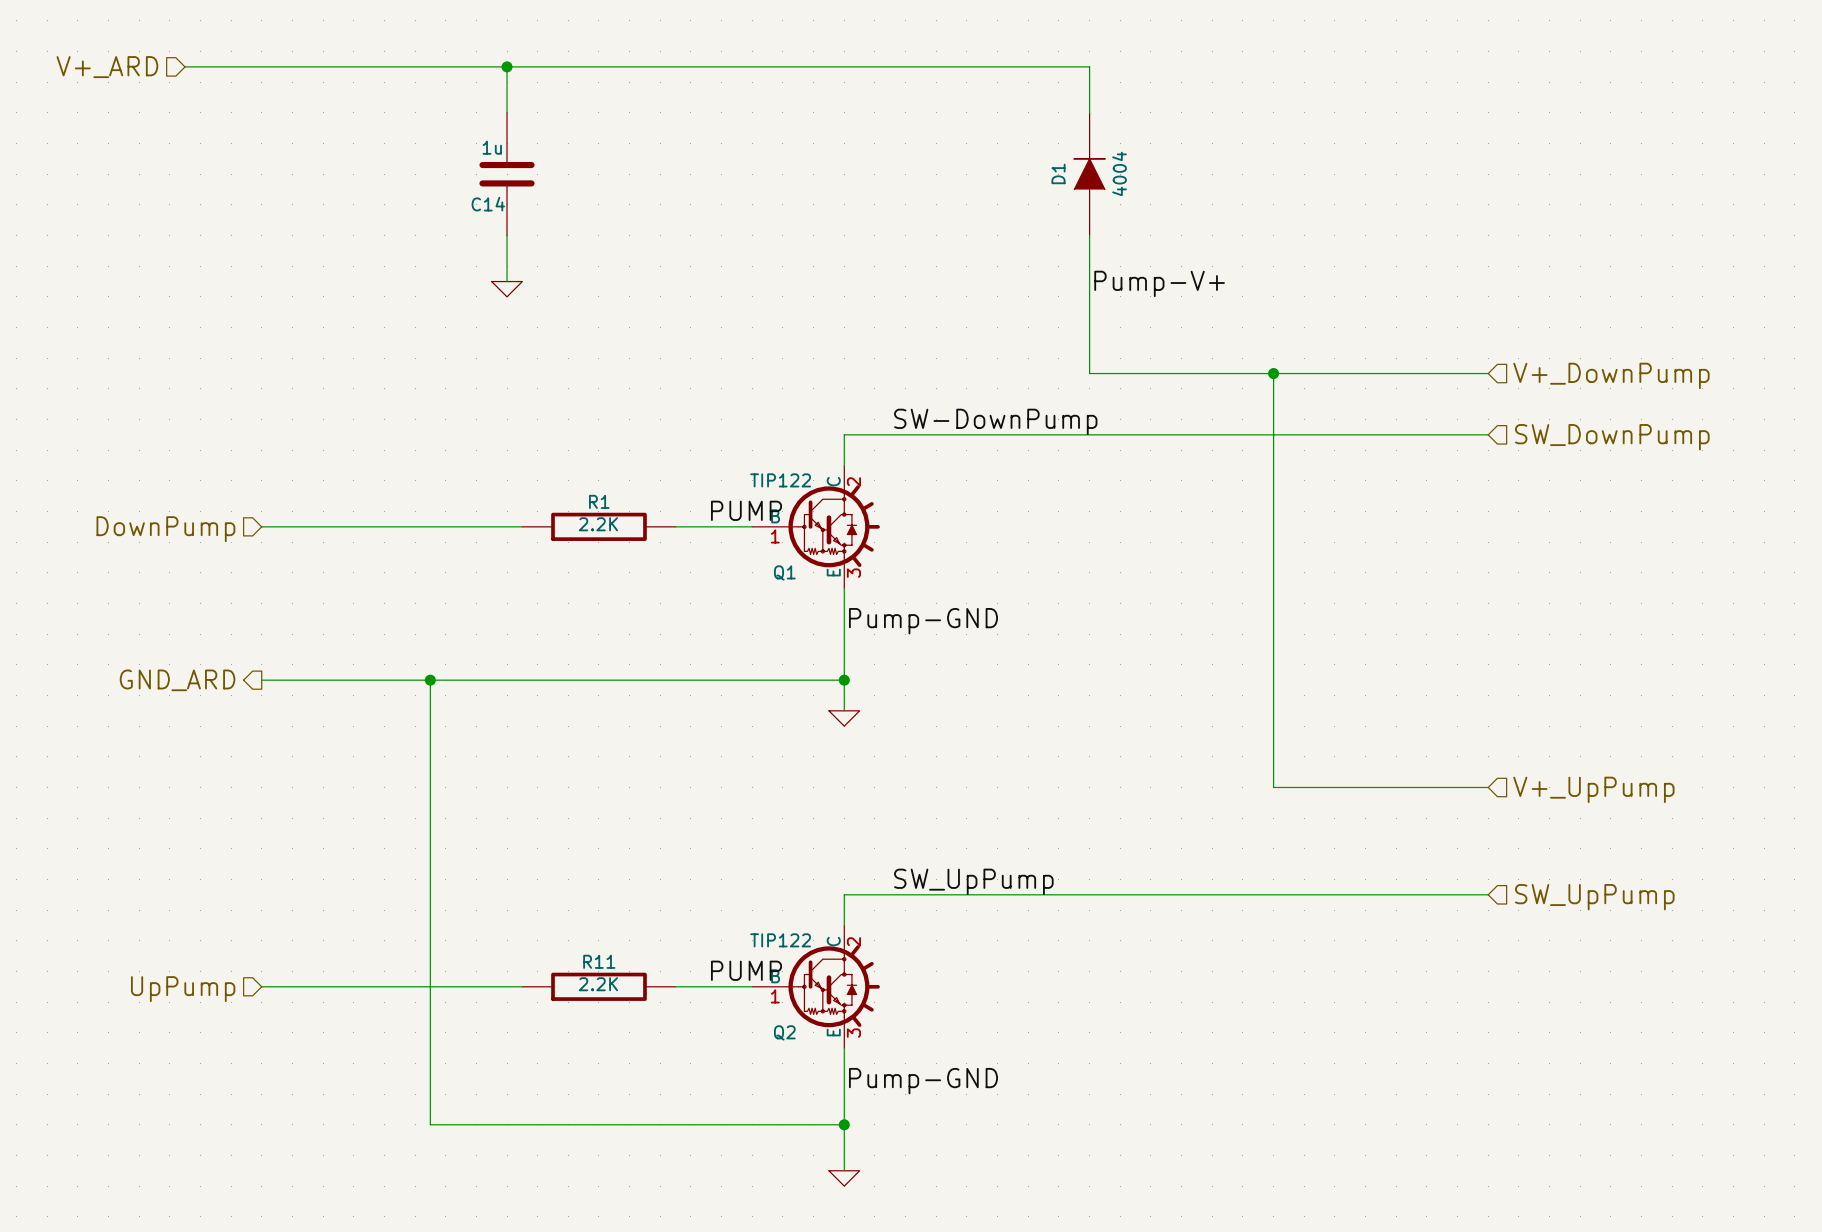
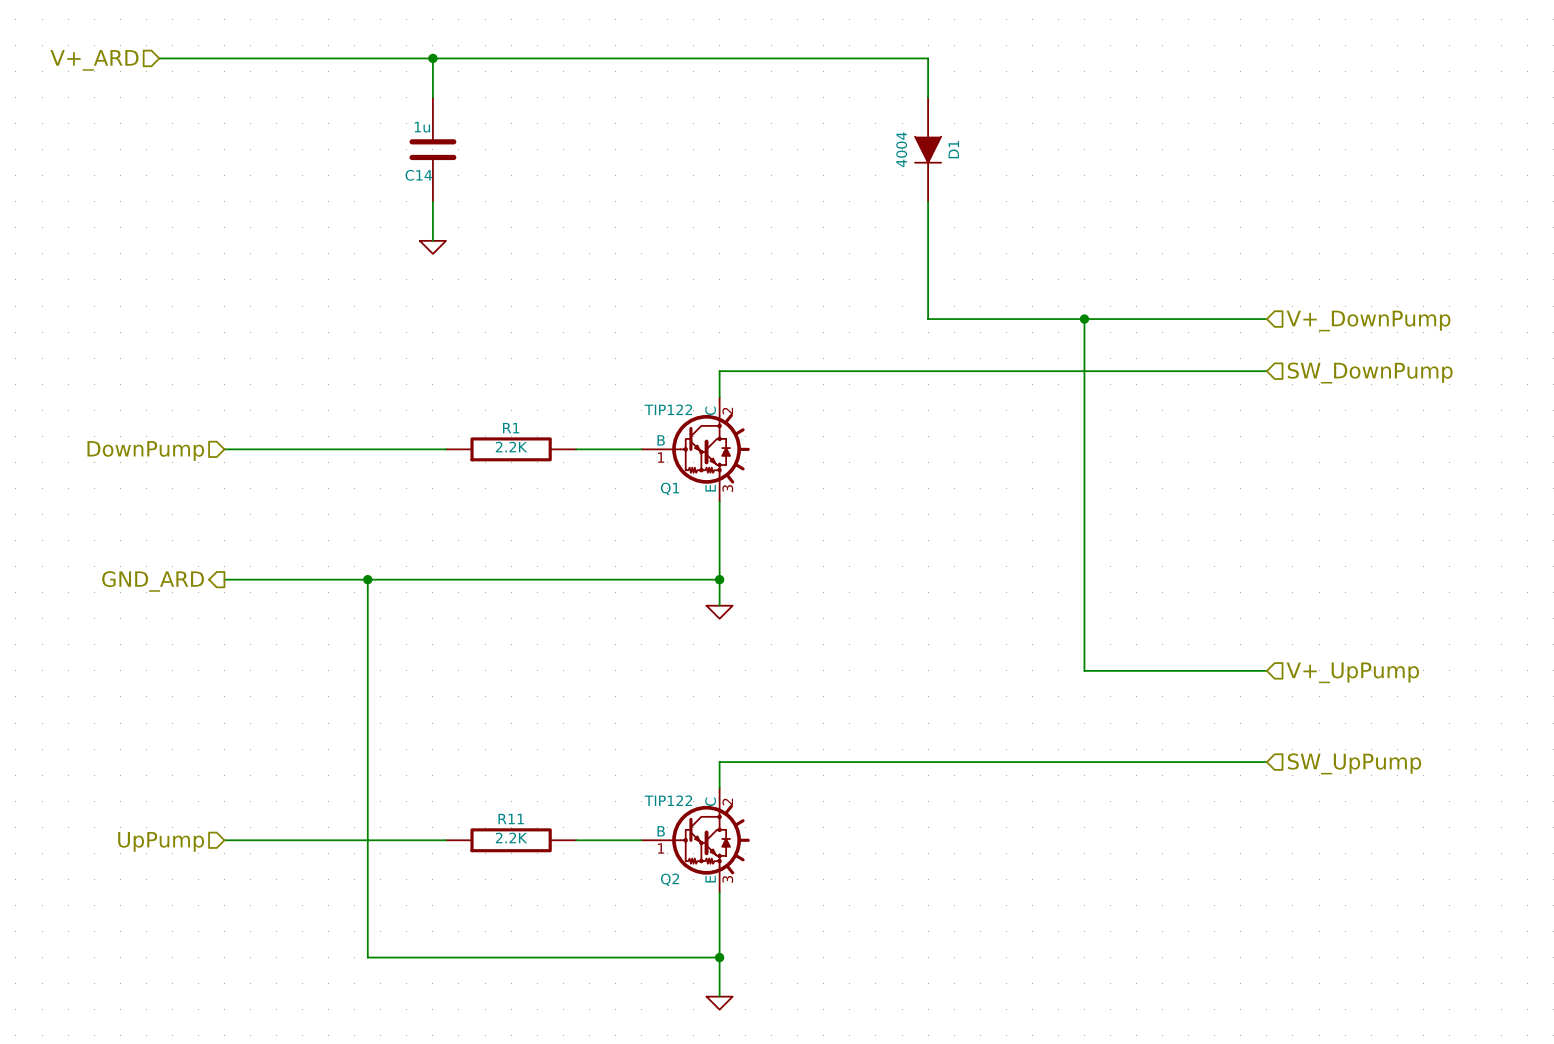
D1 rotation: 0° (1089, 173) -> 180° (928, 150)
label: Pump-V+ (1159, 283) -> none
label: SW-DownPump (995, 421) -> none
label: PUMP (746, 510) -> none
label: Pump-GND (923, 621) -> none
label: SW_UpPump (973, 881) -> none
label: PUMP (746, 970) -> none
label: Pump-GND (923, 1081) -> none

